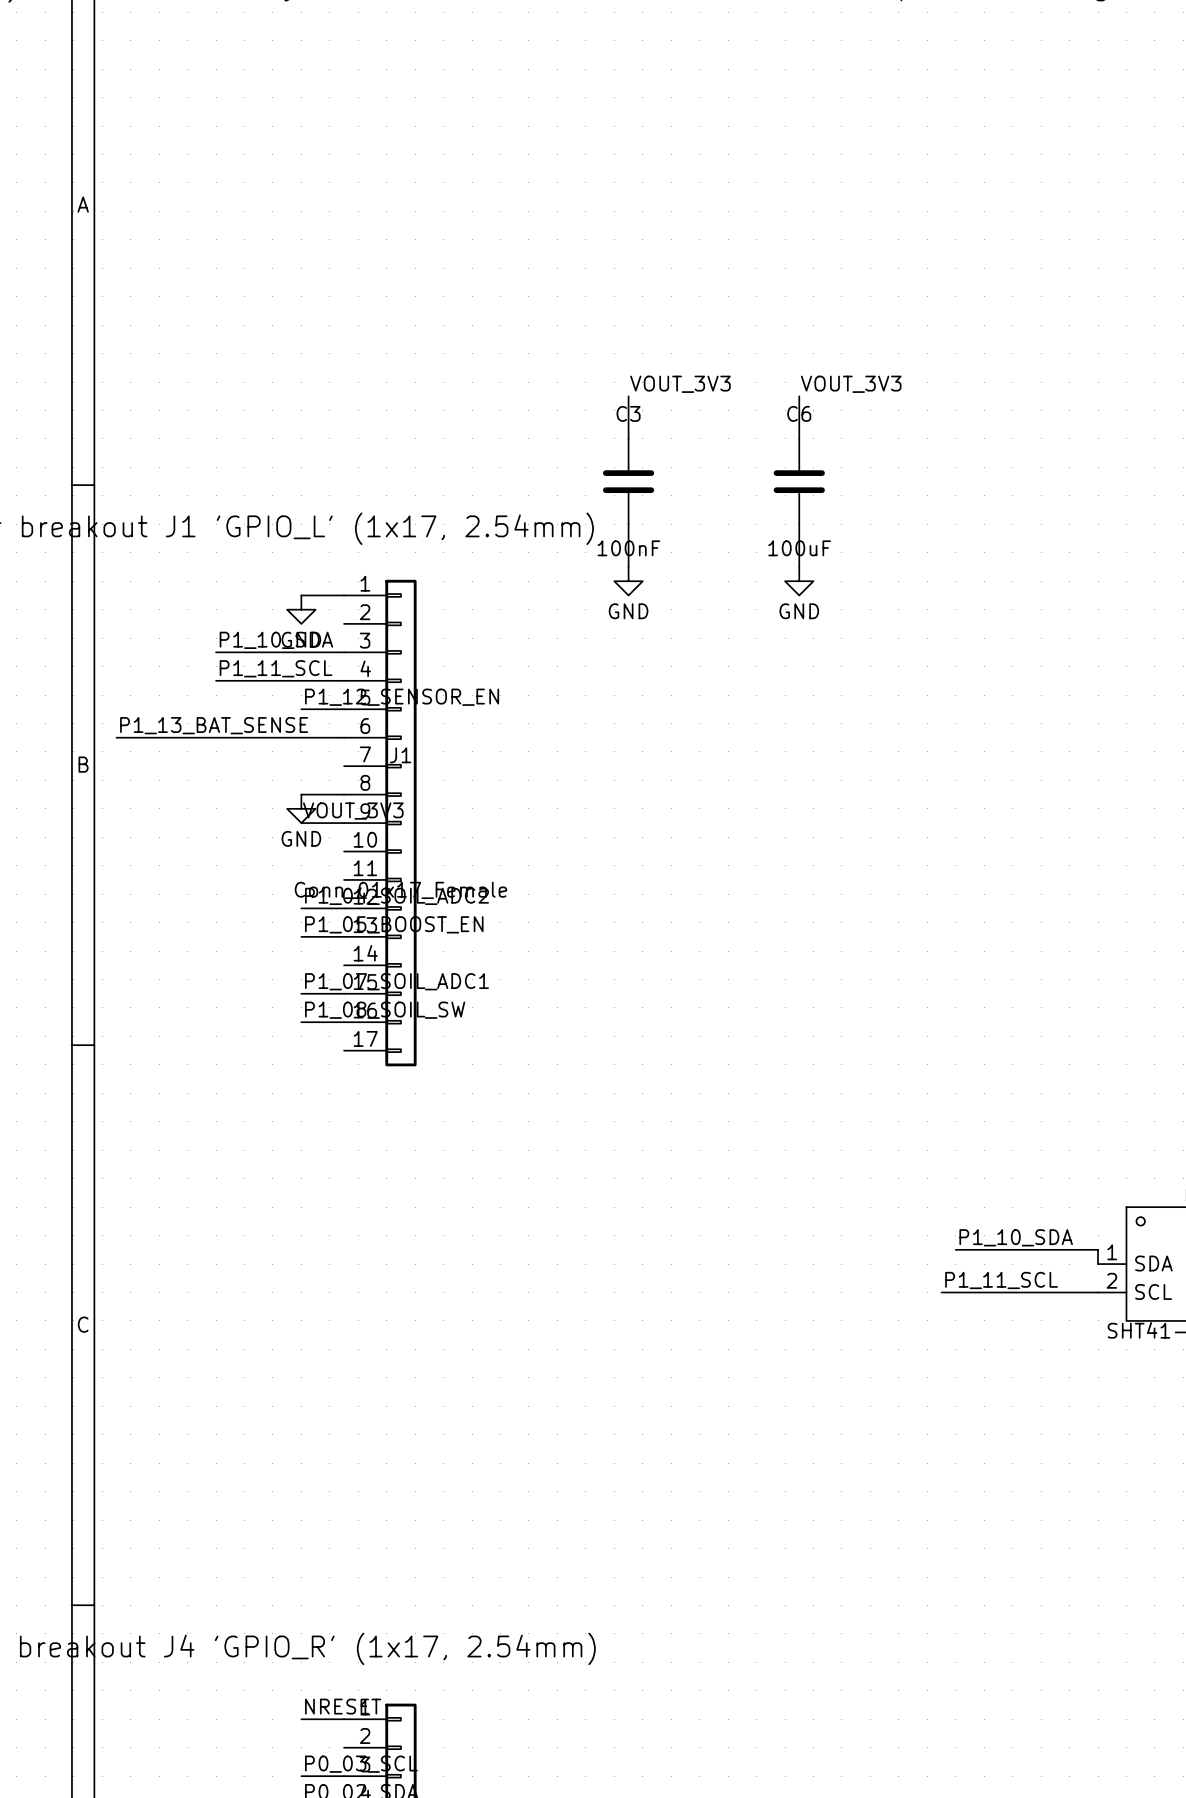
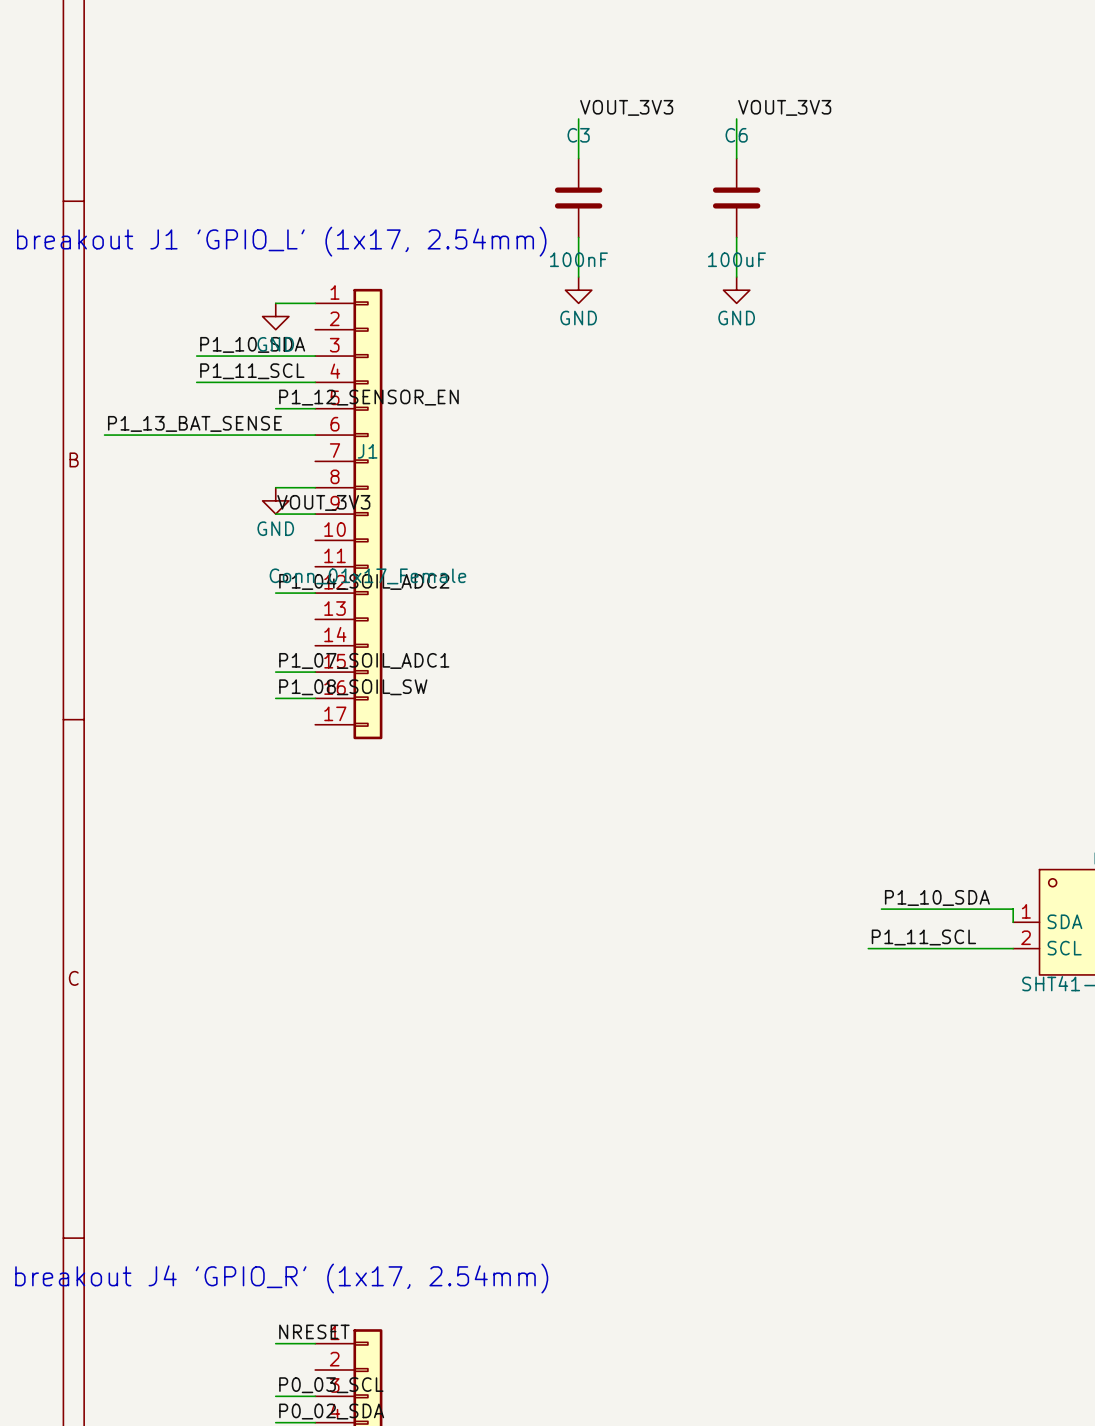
label: P1_05_BOOST_EN (394, 924) -> none
wire: (301, 936) (344, 936) -> none

